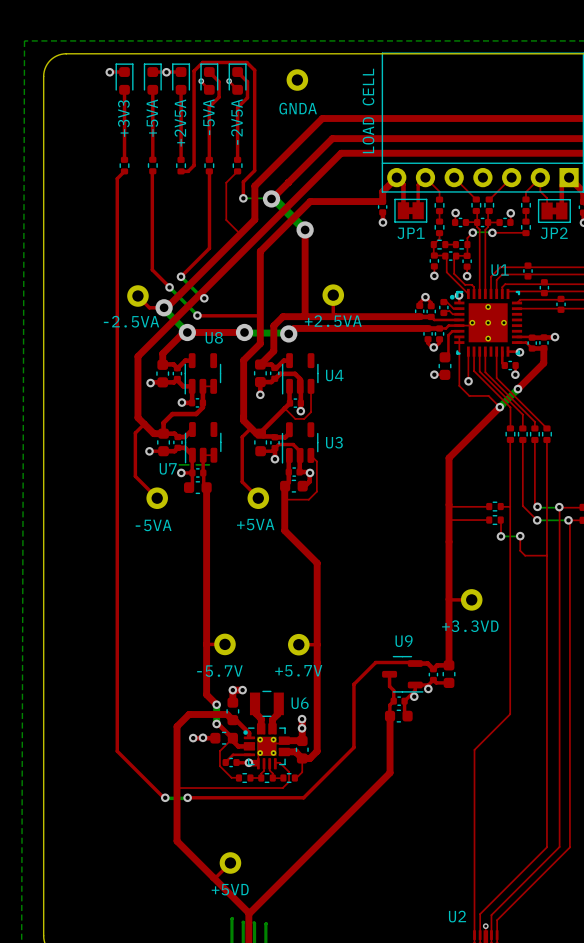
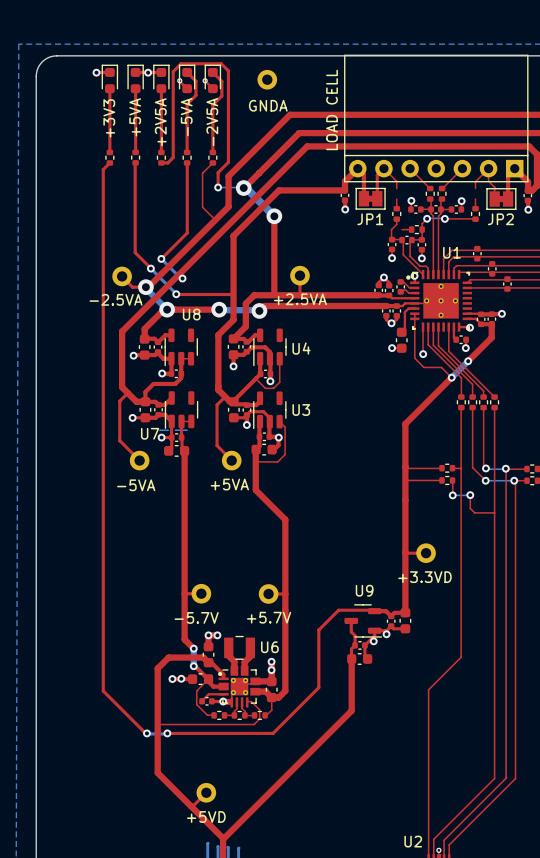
part: (439, 205) -> none
part: (526, 205) -> none
part: (439, 244) -> none

